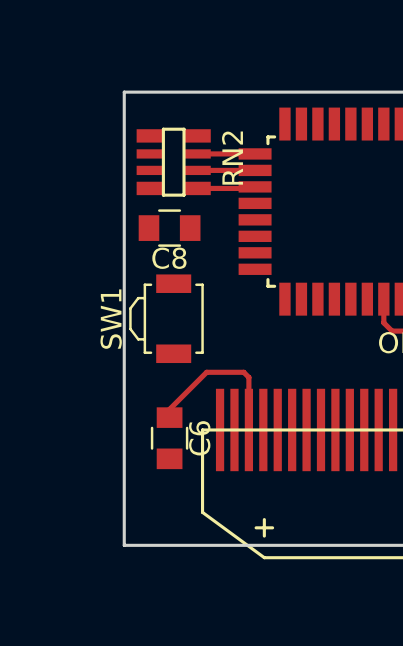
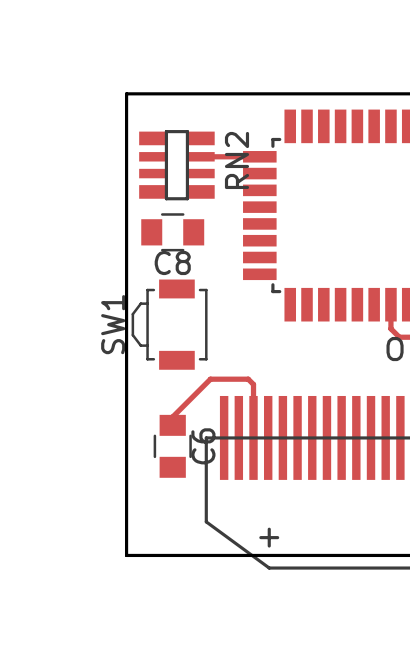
track: (197, 170) (255, 170) -> none
track: (255, 186) (253, 188) (197, 188) -> none

